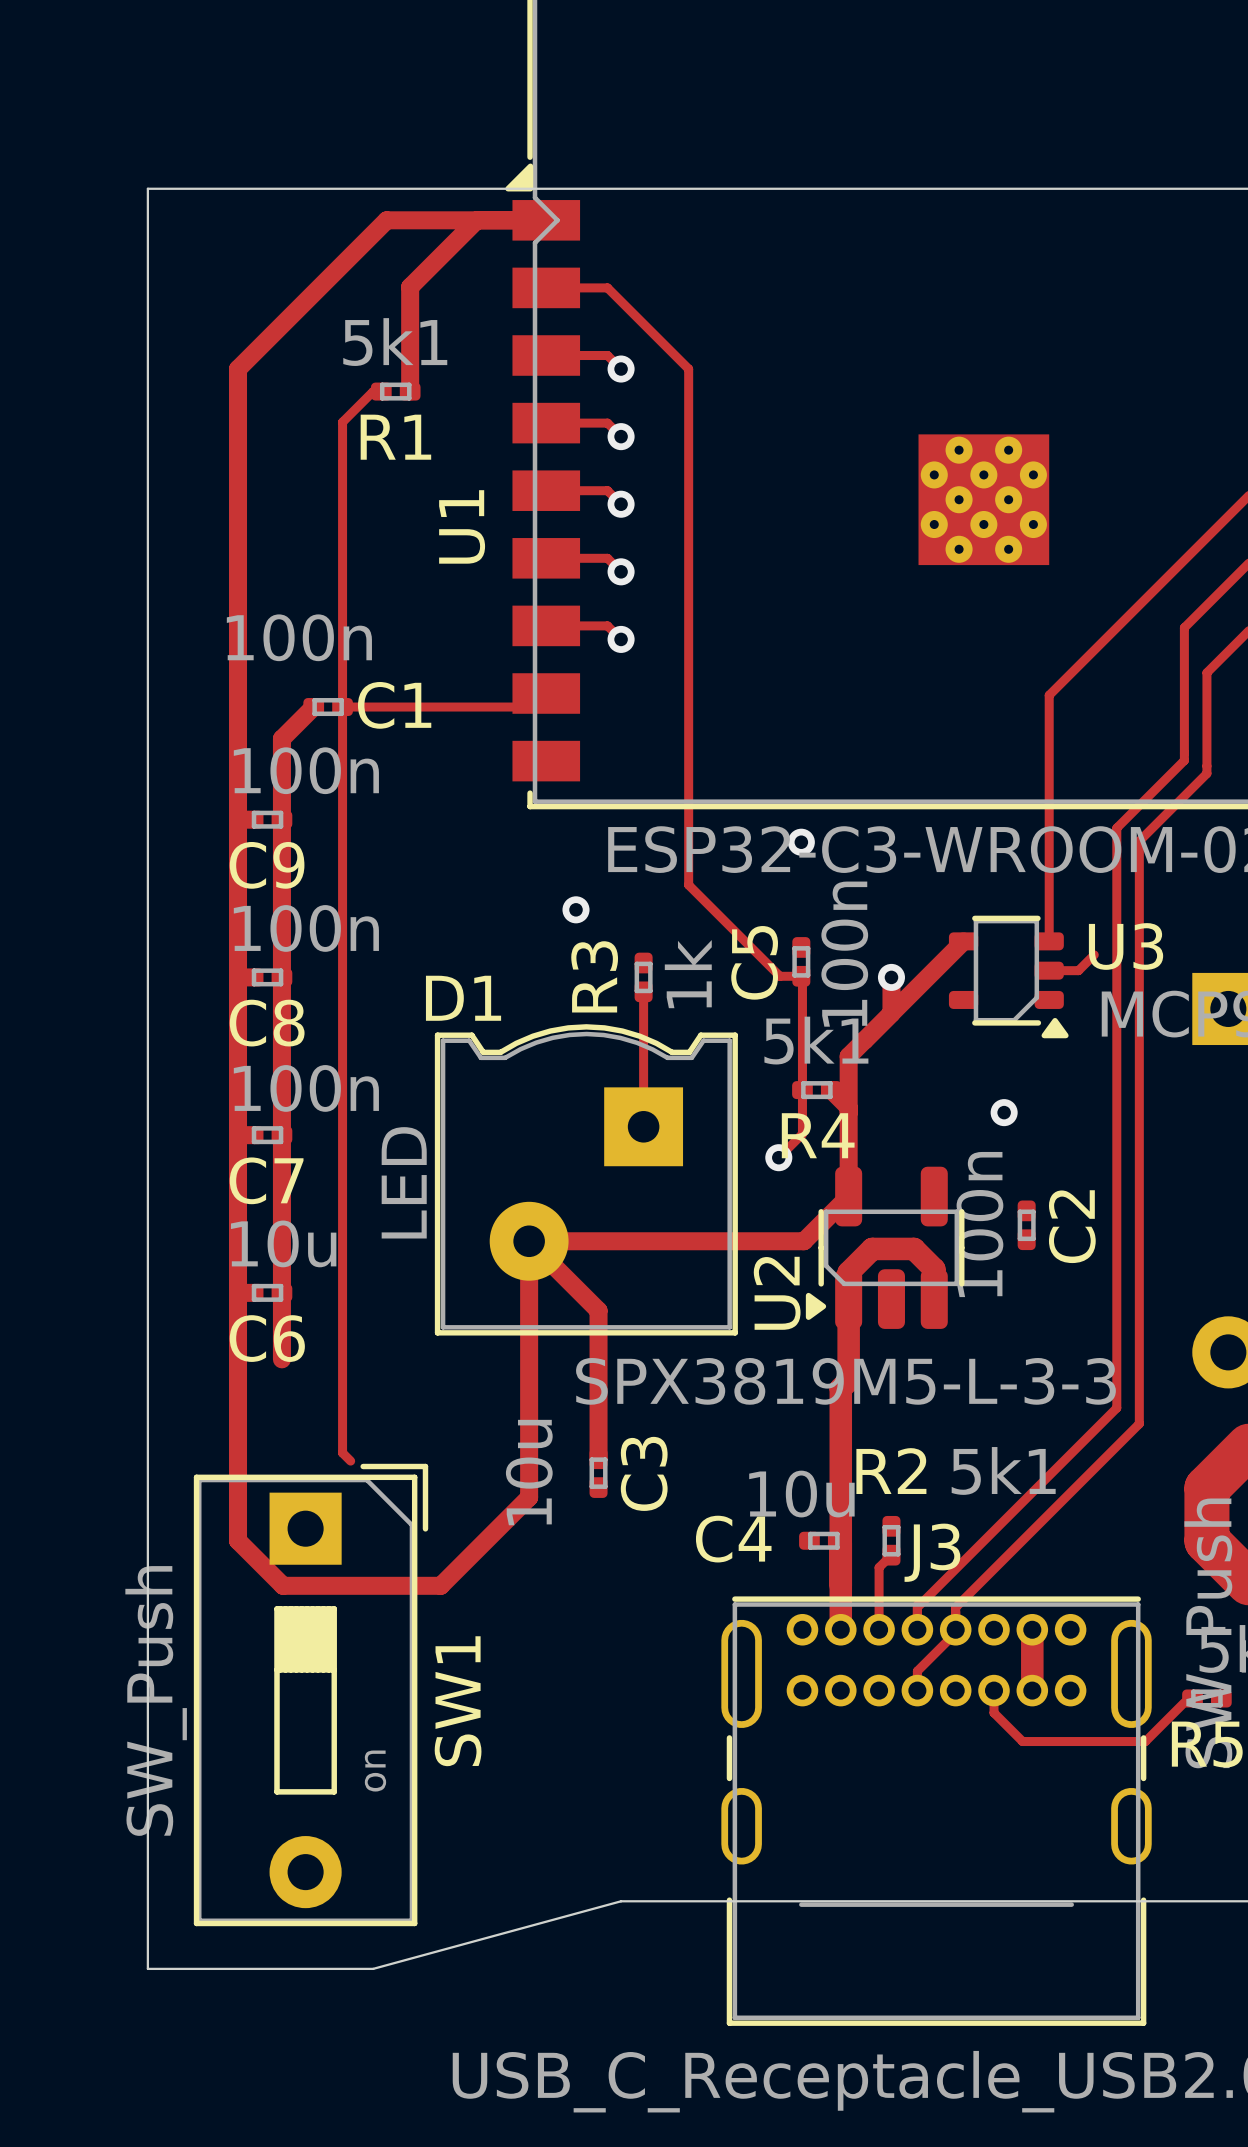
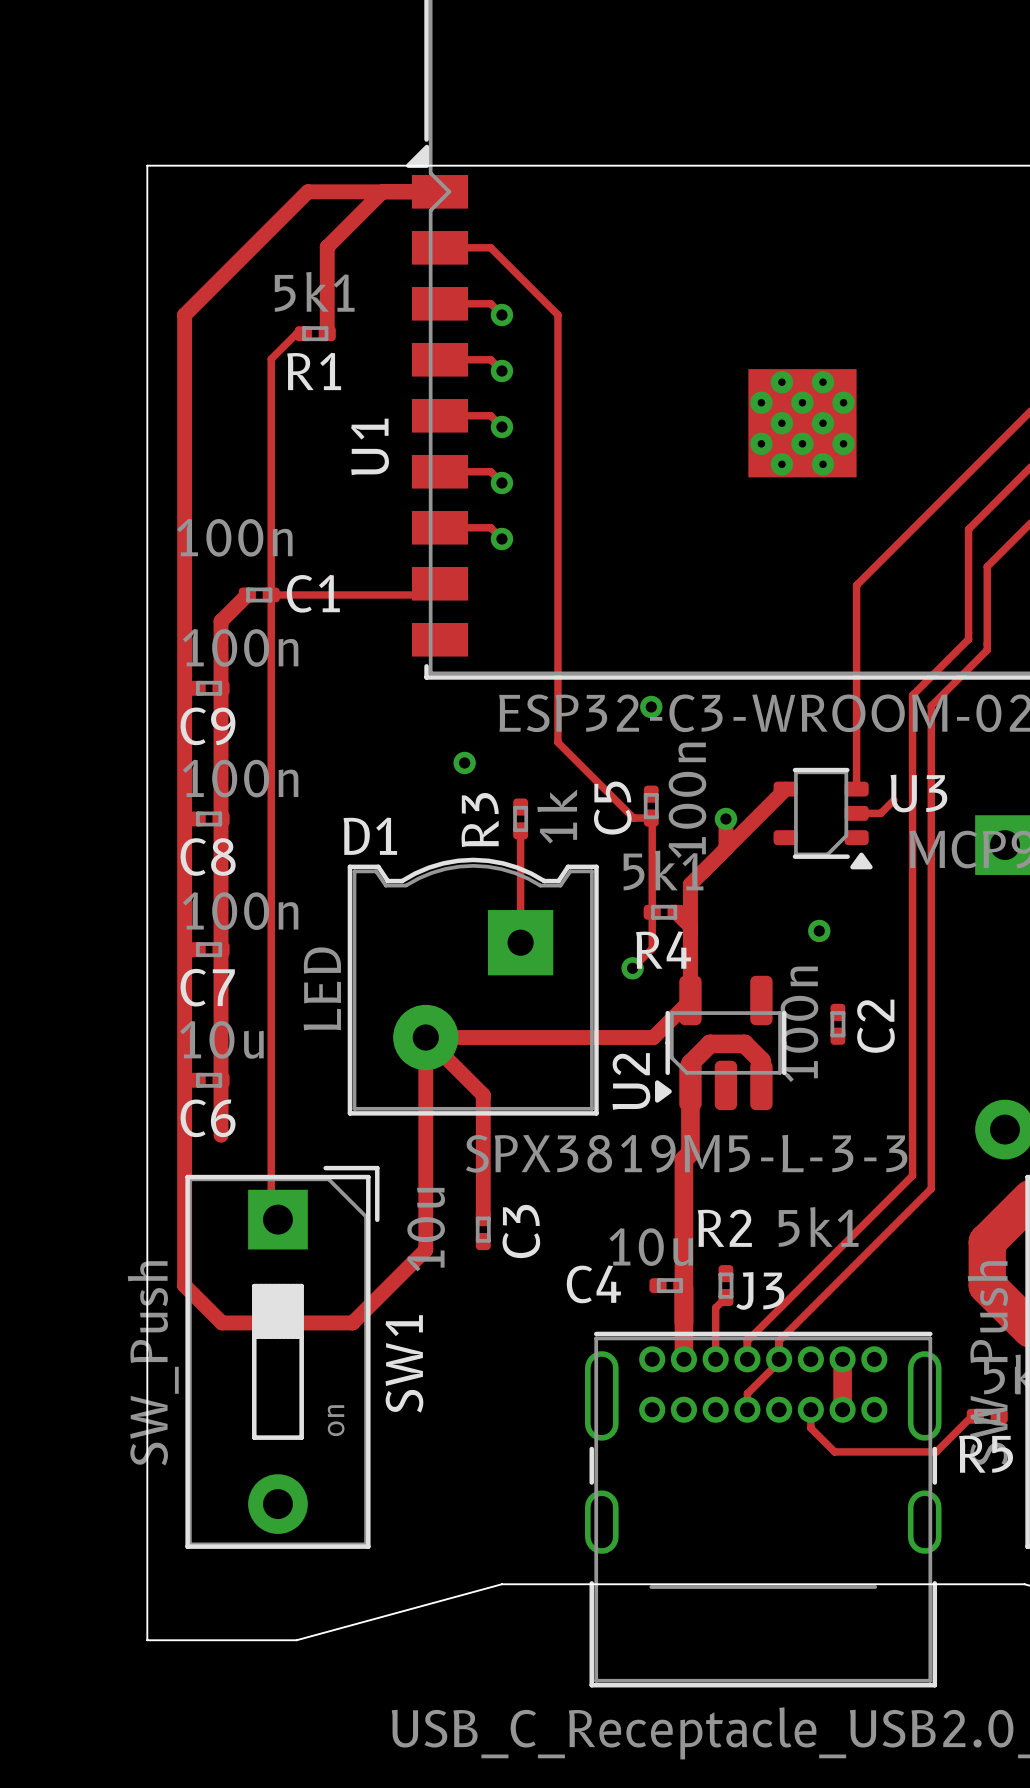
board edge: (192, 188) (147, 188) (147, 1968) (192, 1968) -> (147, 165) (147, 1640)
SW1 position: (311, 1694) -> (282, 1357)

